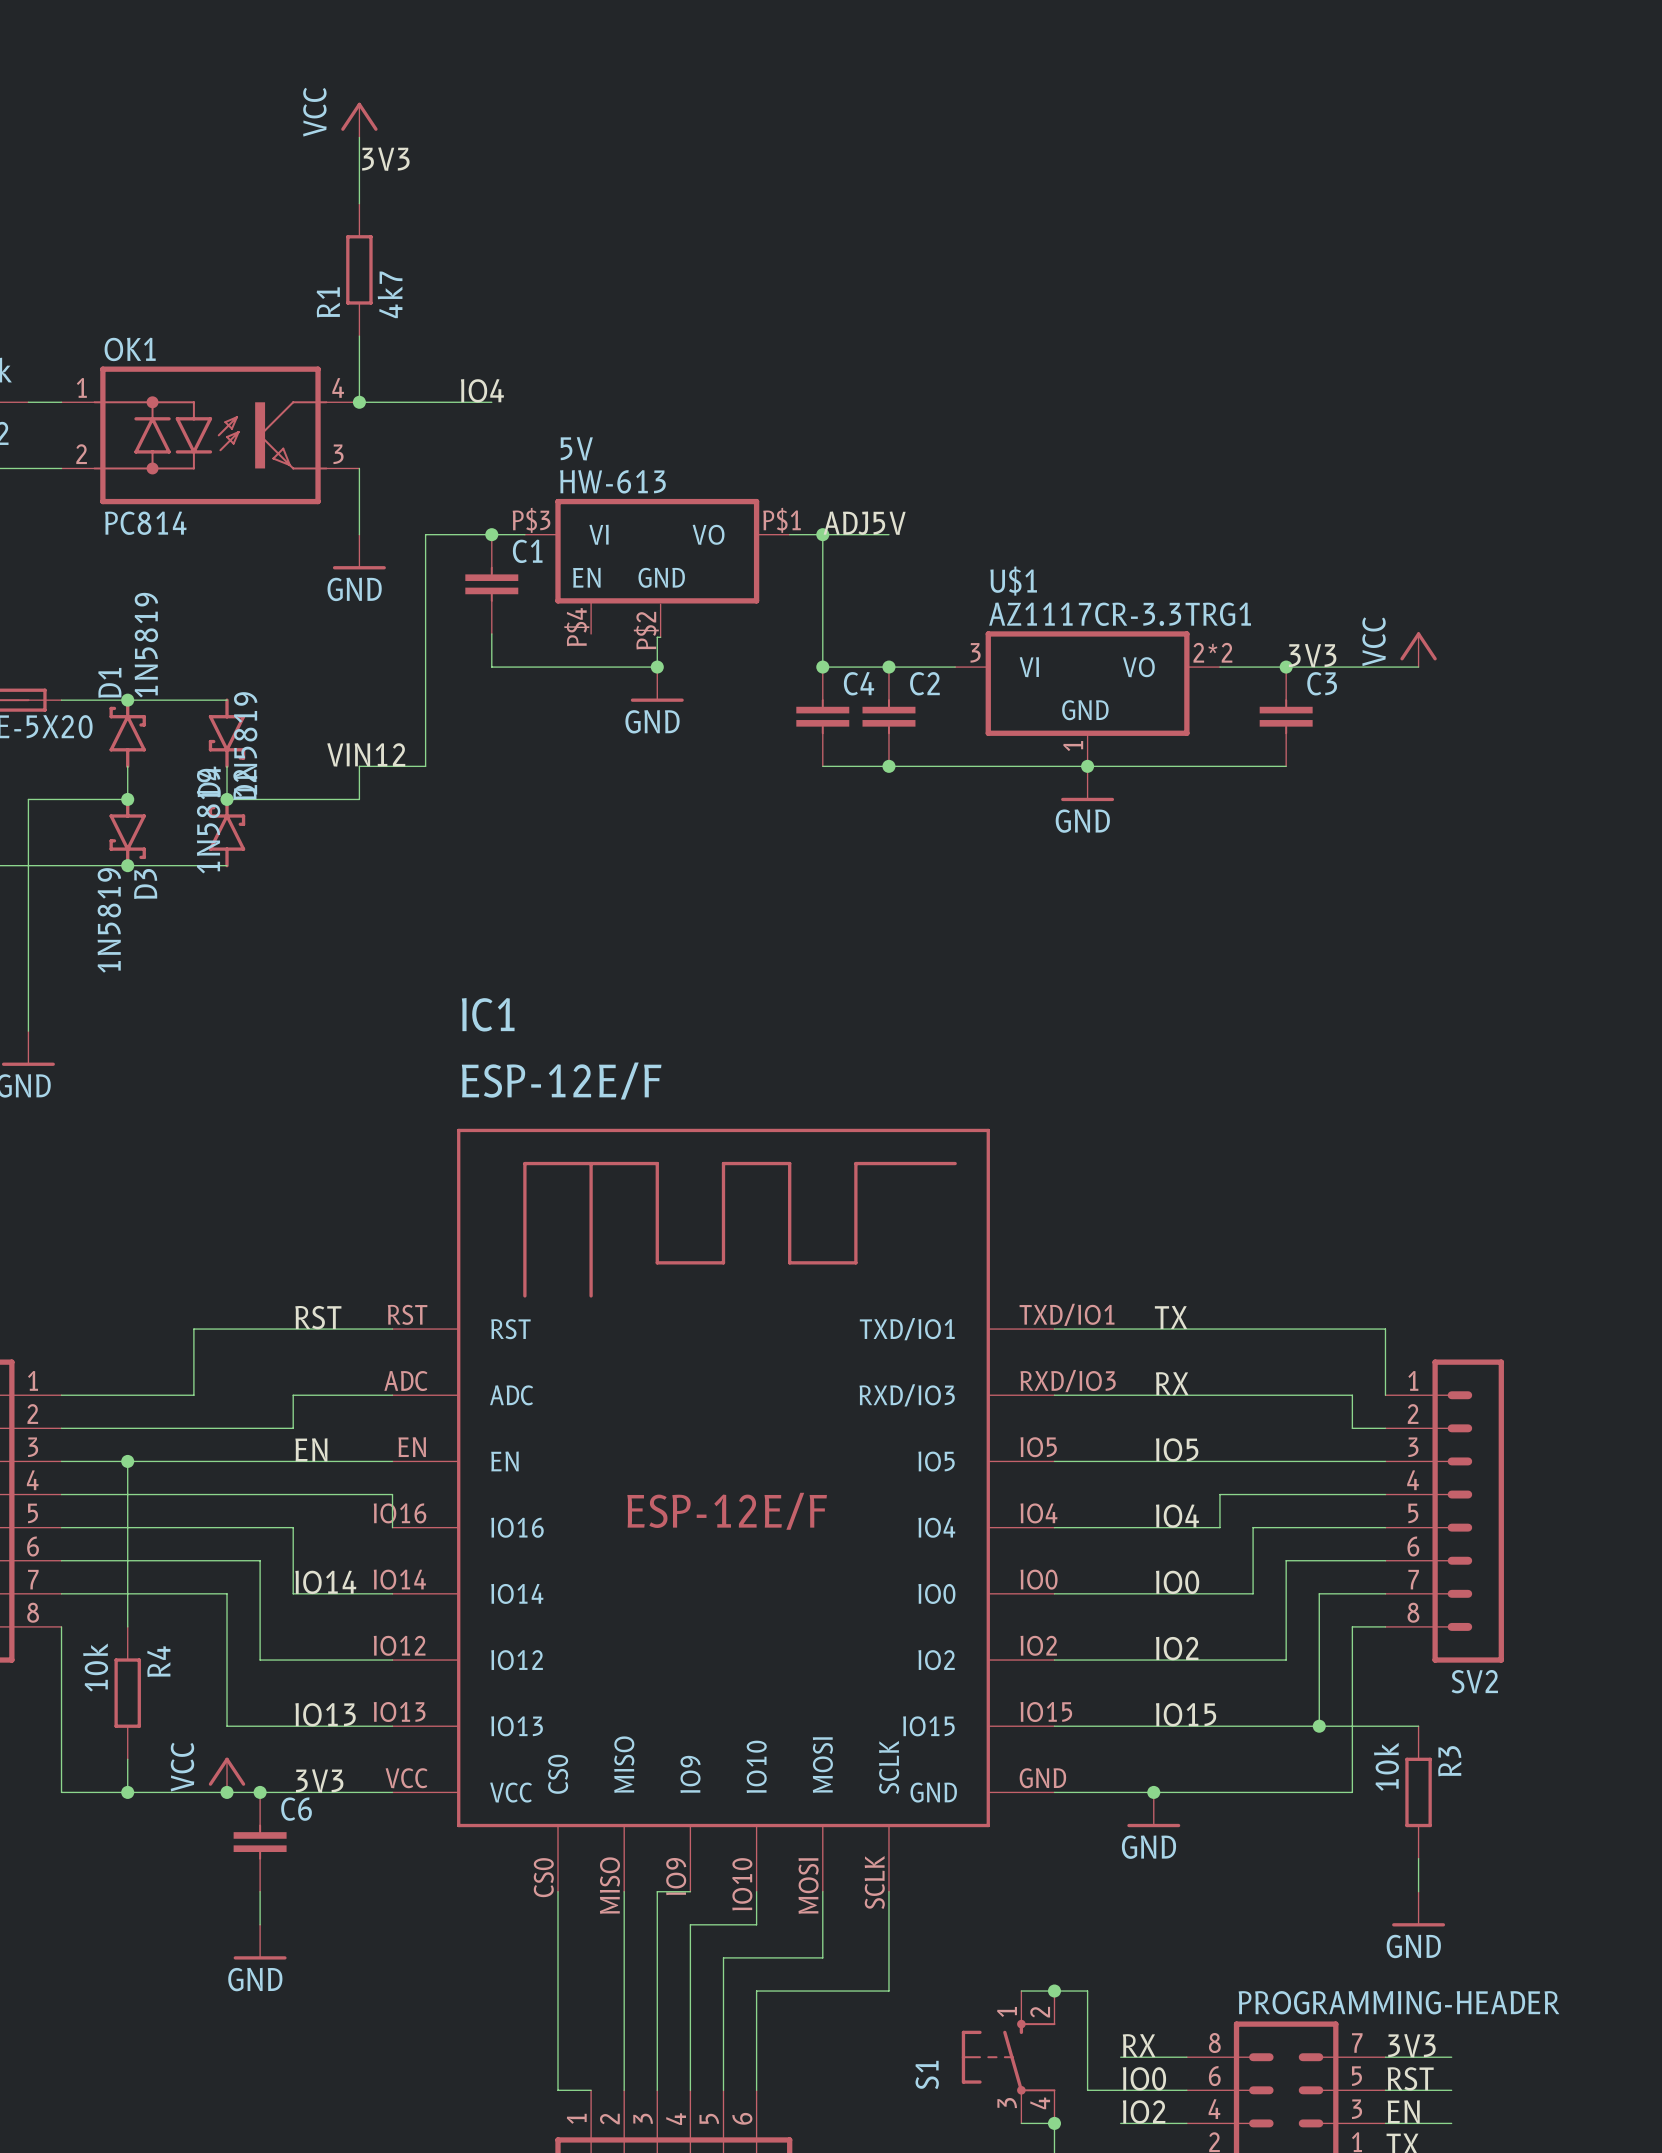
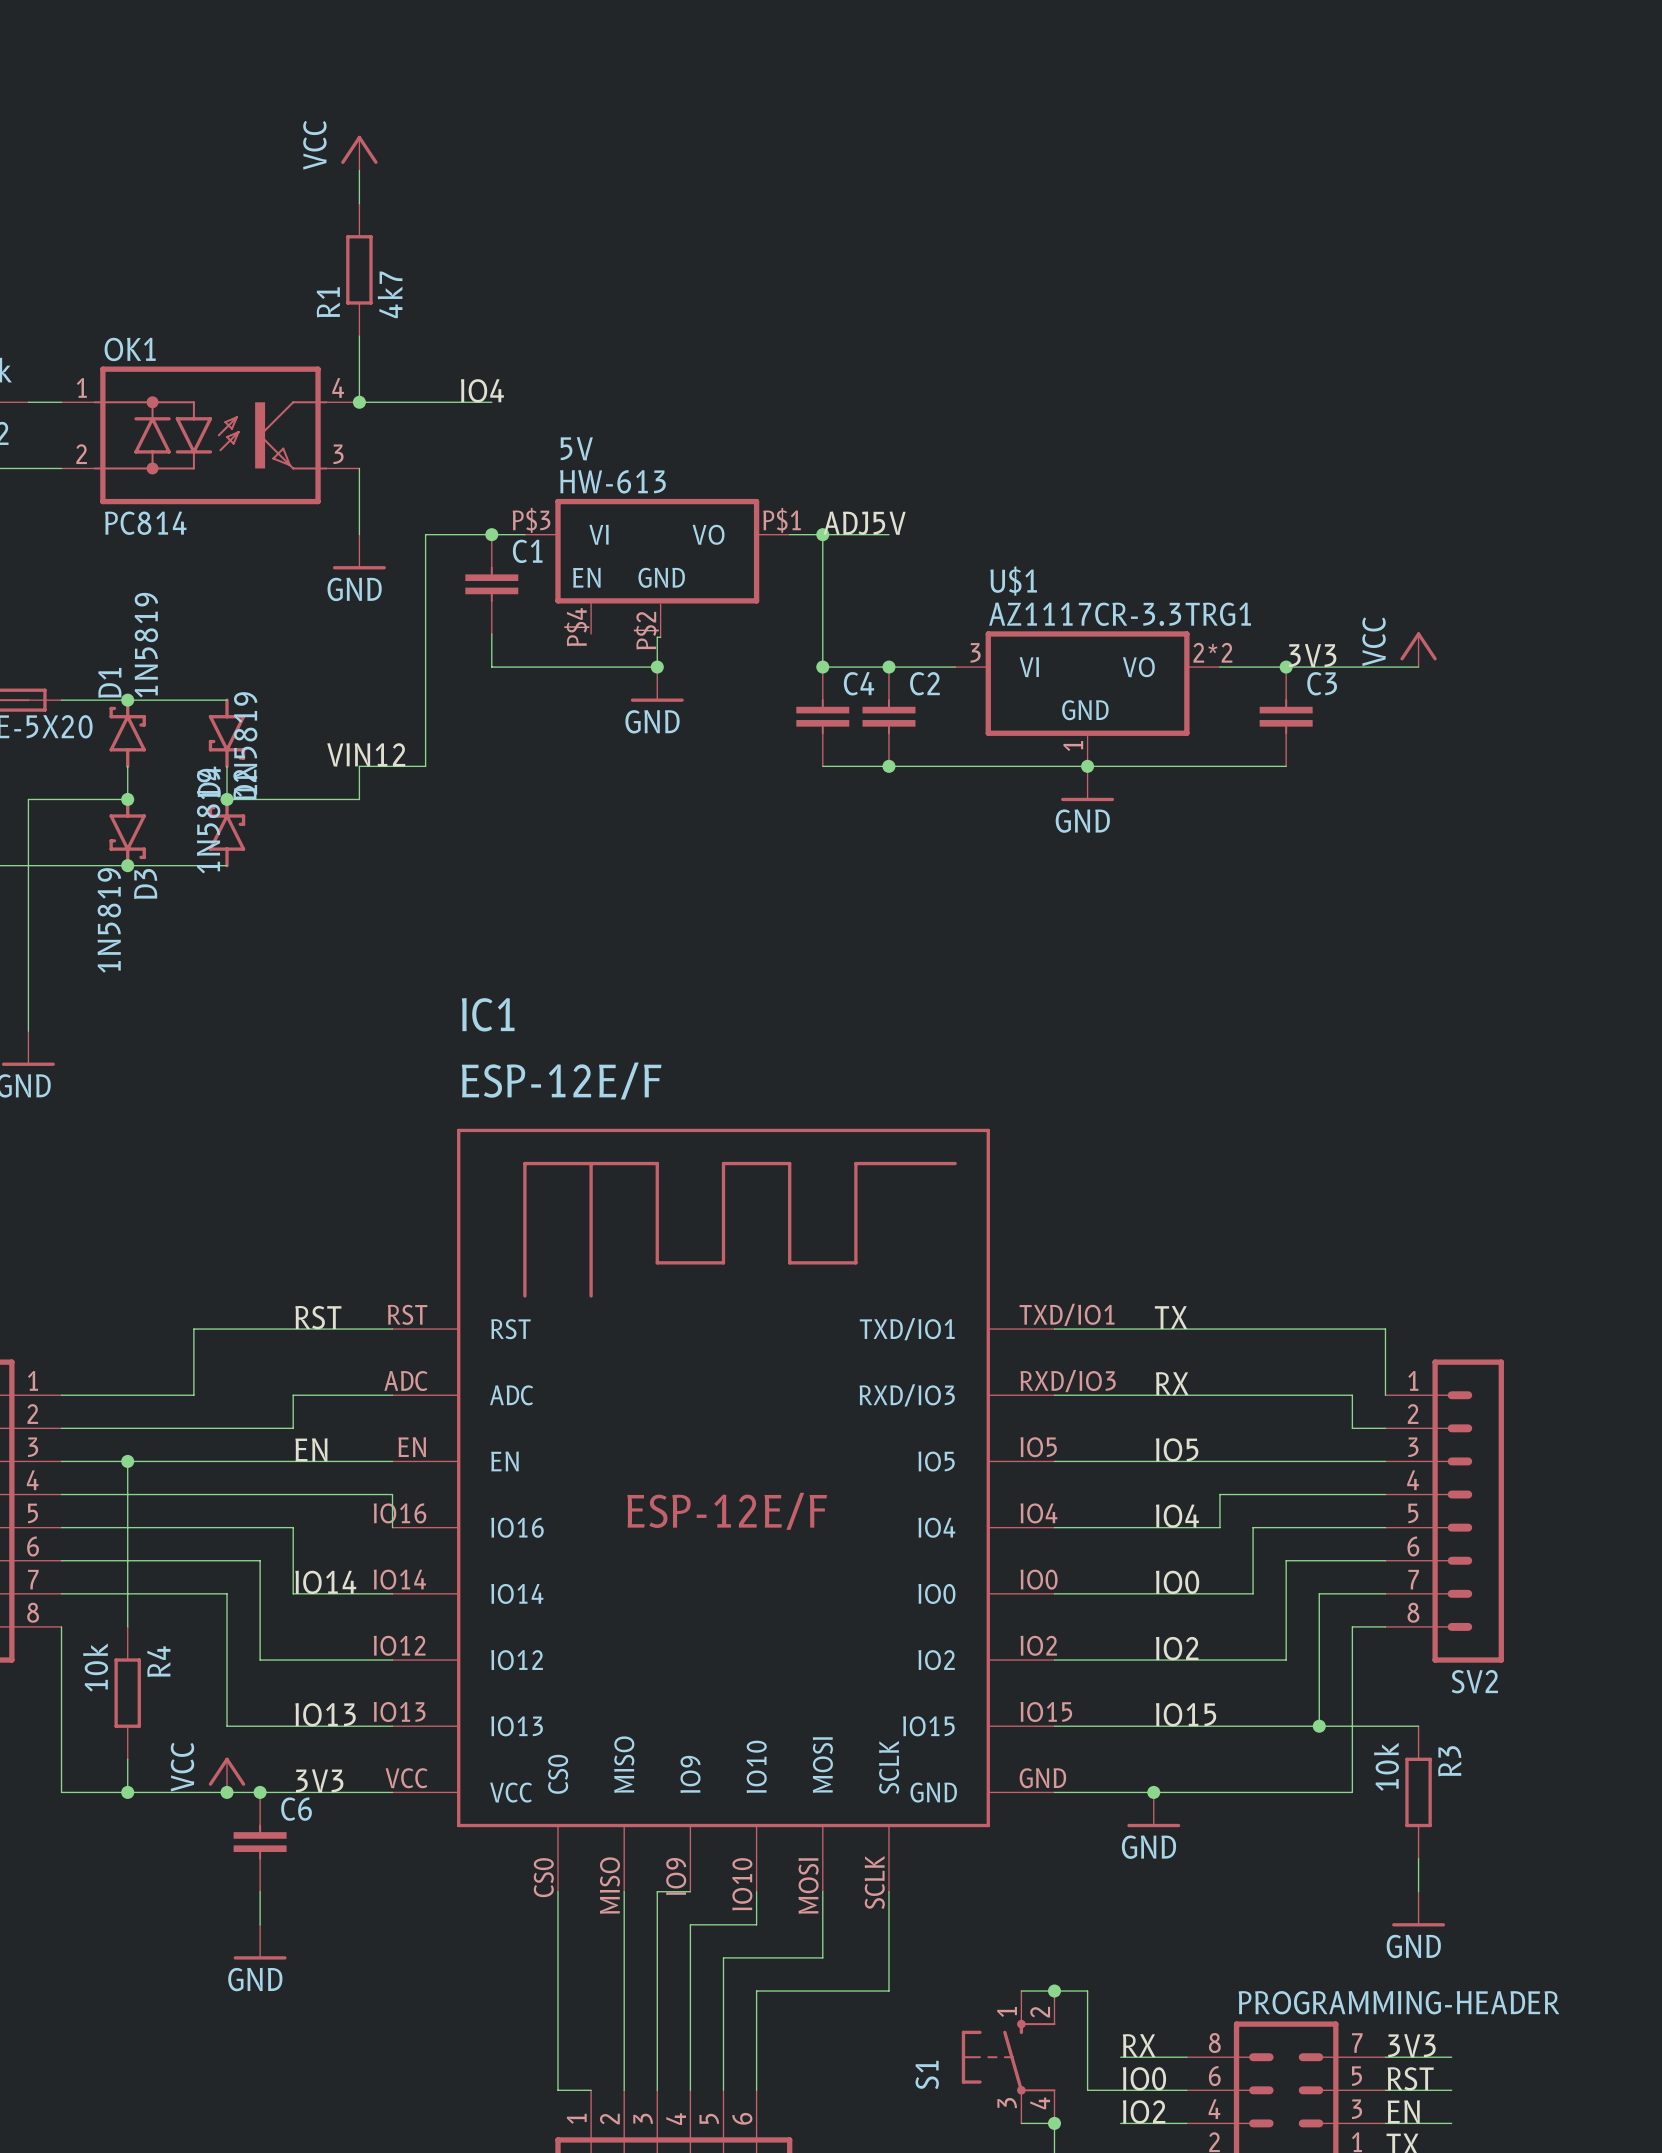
power symbol position: VCC (359, 120) -> VCC (359, 153)
label: 3V3 (385, 159) -> none

